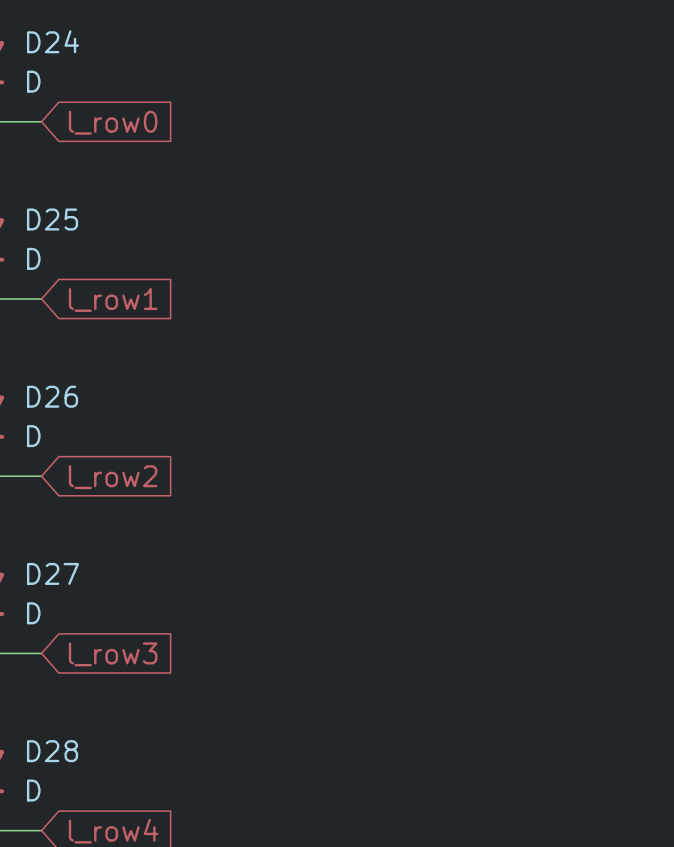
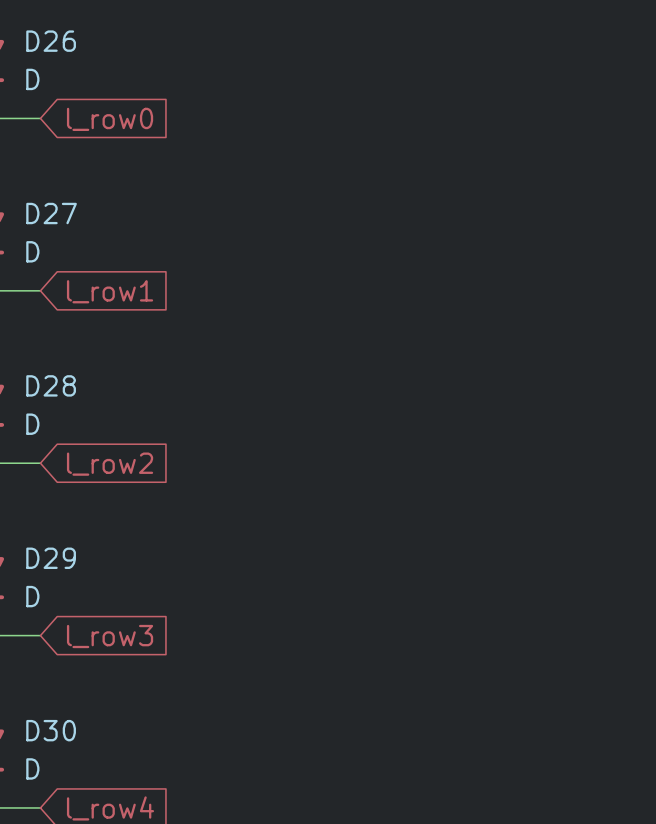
D24 name: D24 (53, 41) -> D26 (51, 41)
D25 name: D25 (52, 219) -> D27 (51, 213)
D26 name: D26 (52, 396) -> D28 (51, 385)
D27 name: D27 (53, 573) -> D29 (51, 558)
D28 name: D28 (52, 751) -> D30 (51, 730)

